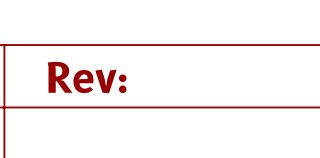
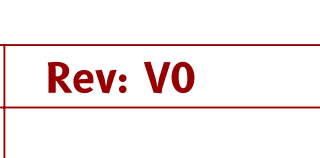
title block: Rev: (87, 77) -> Rev: V0 (121, 77)

